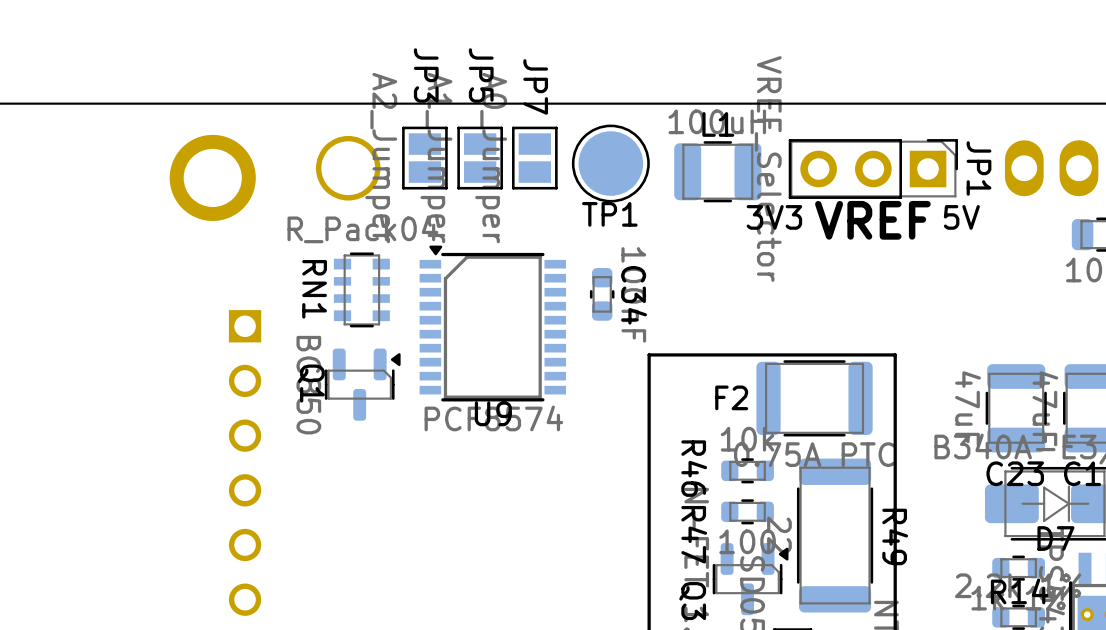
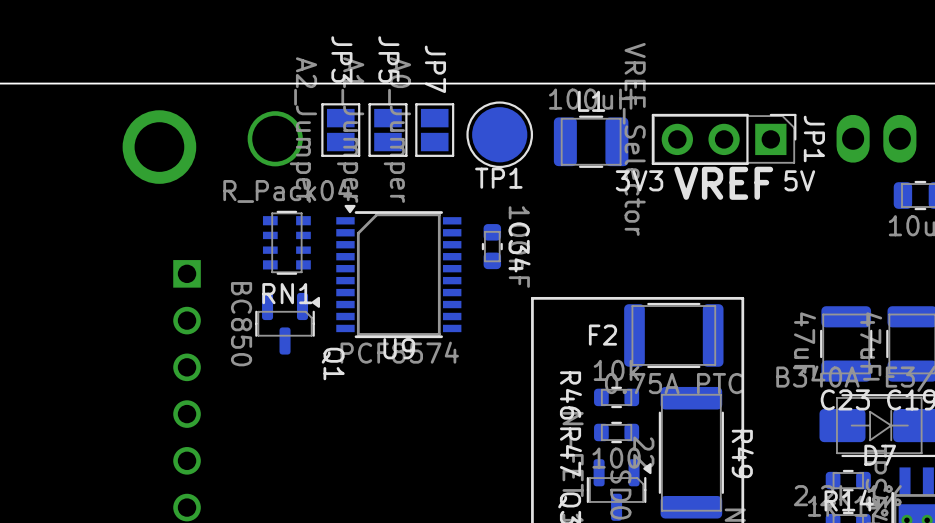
RN1 name rotation: 0° (314, 289) -> 90° counterclockwise (287, 293)
RN1 name position: RN1 (314, 289) -> RN1 (287, 293)
Q1 name position: Q1 (311, 383) -> Q1 (333, 364)

